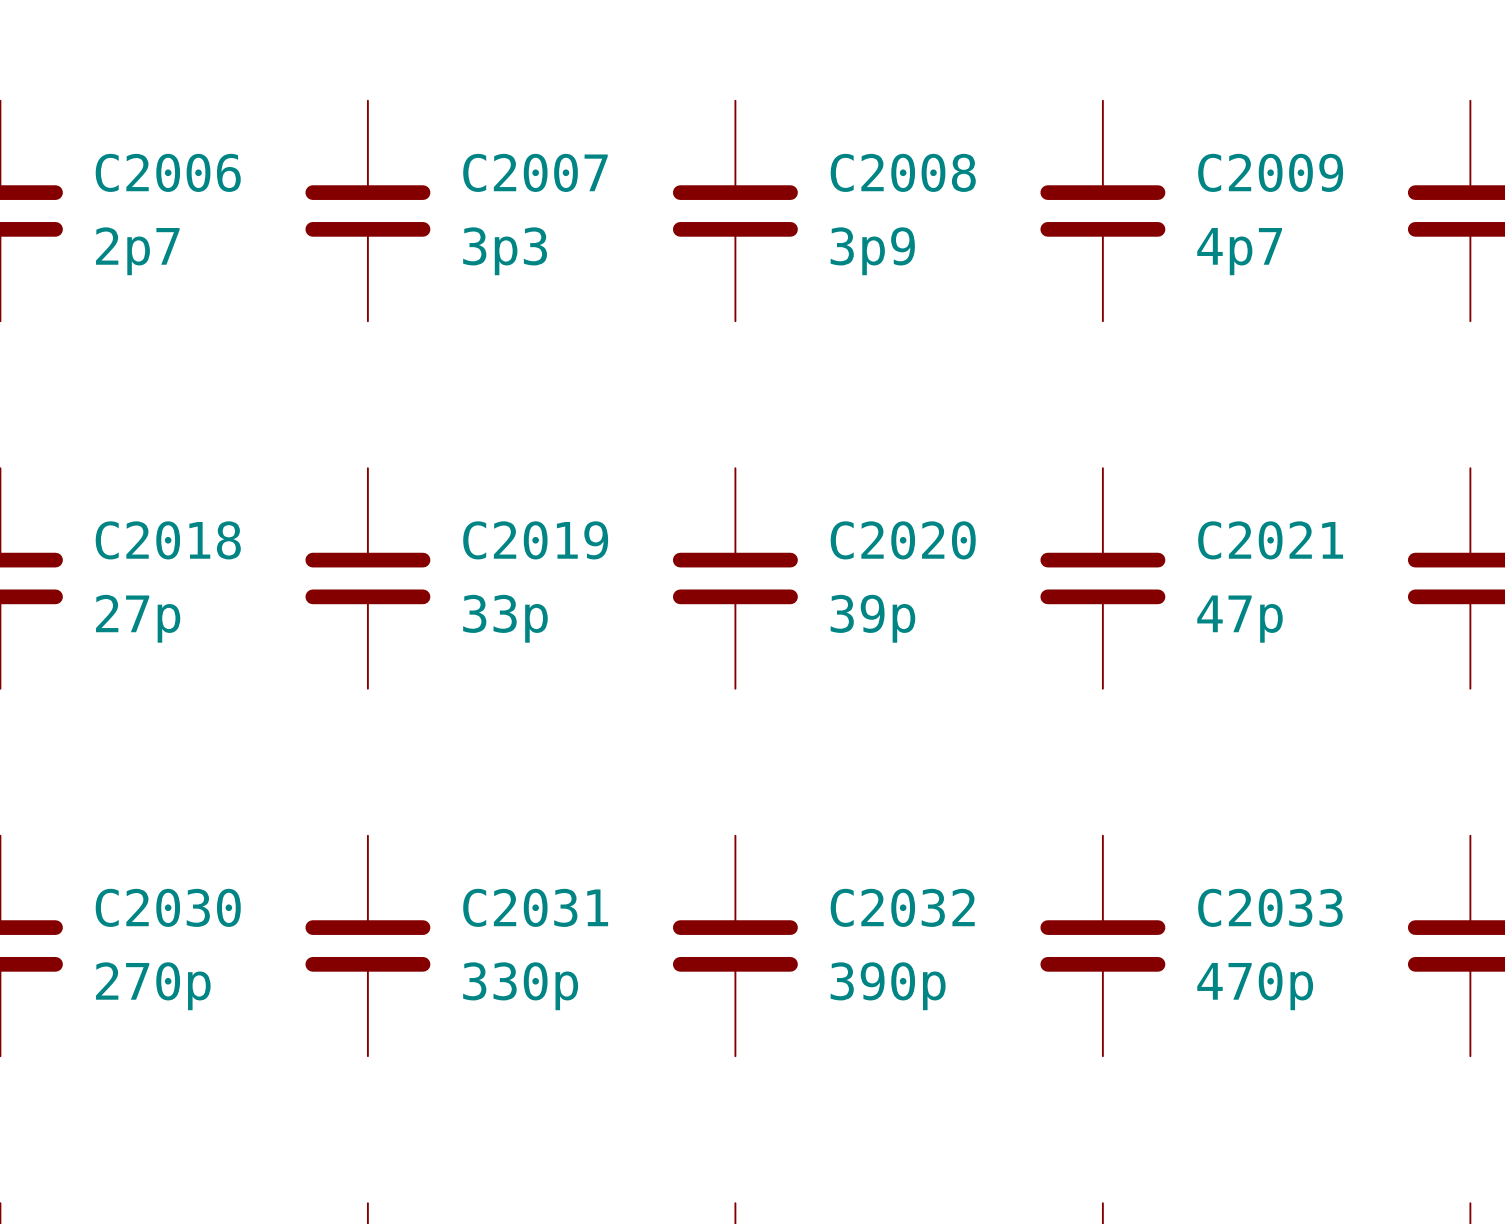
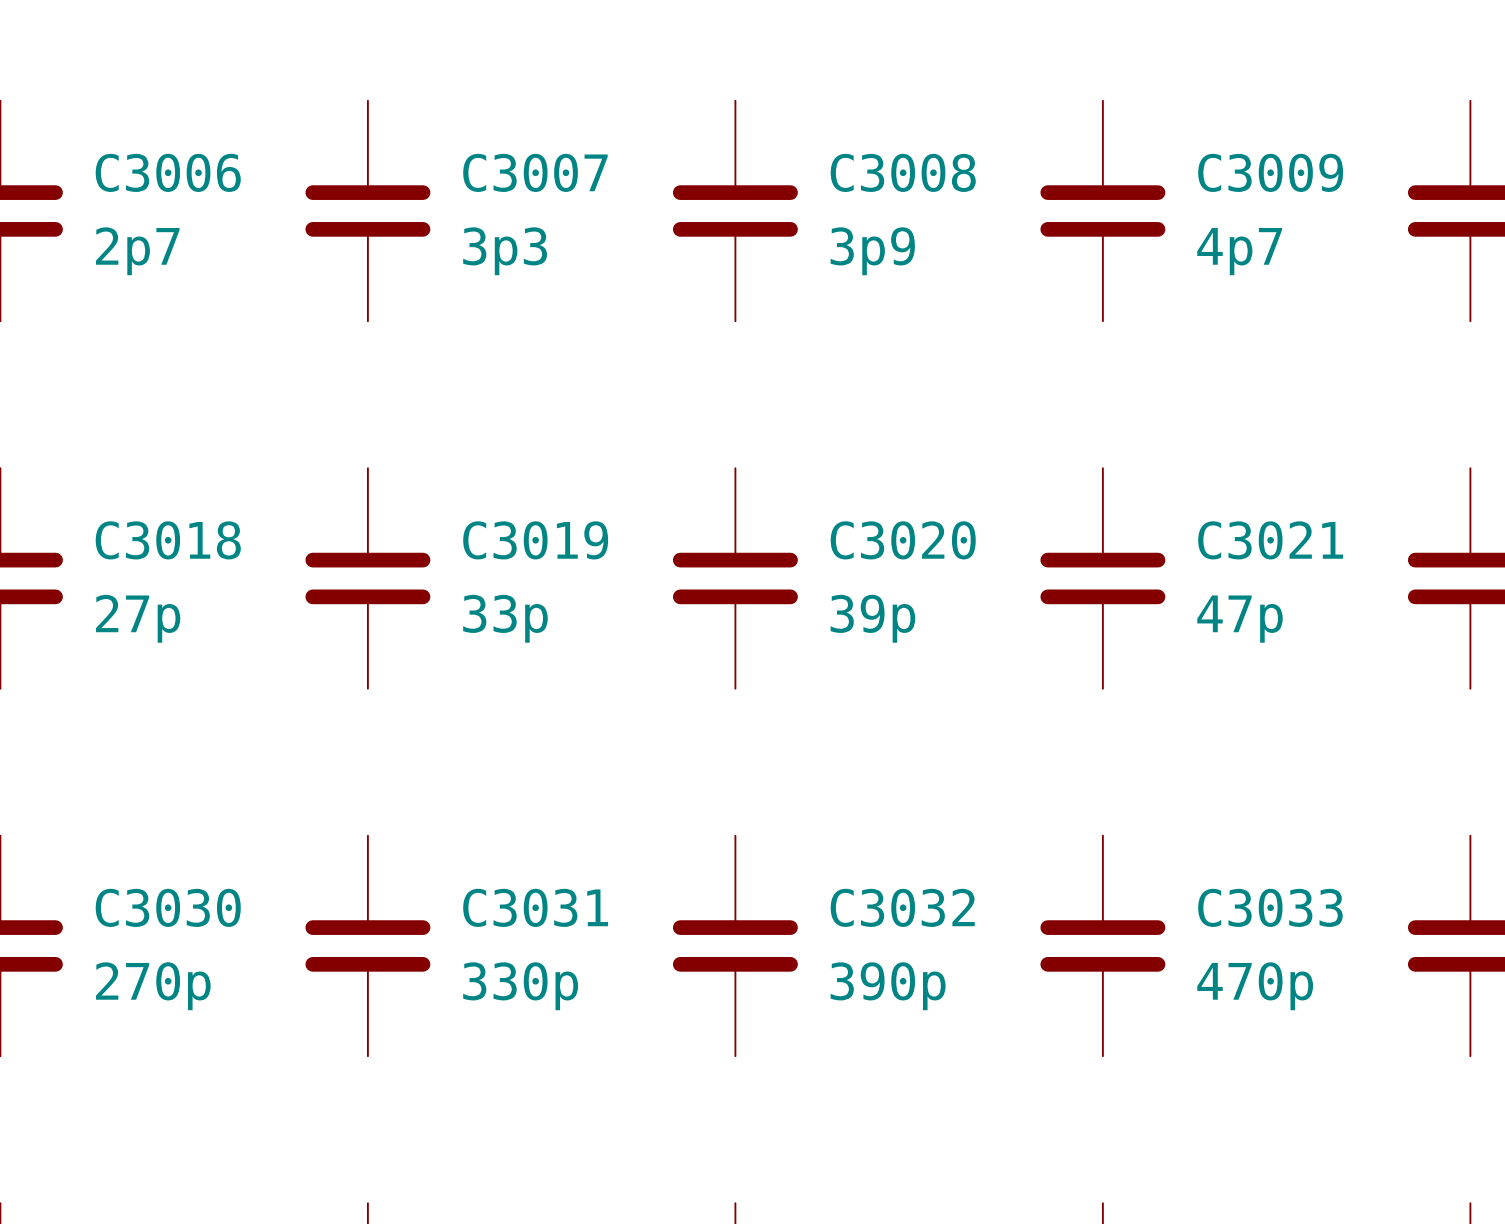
C2006 name: C2006 (168, 172) -> C3006 (168, 172)
C2007 name: C2007 (535, 172) -> C3007 (535, 172)
C2008 name: C2008 (903, 172) -> C3008 (903, 172)
C2009 name: C2009 (1270, 172) -> C3009 (1270, 172)
C2018 name: C2018 (168, 540) -> C3018 (168, 540)
C2019 name: C2019 (535, 540) -> C3019 (535, 540)
C2020 name: C2020 (903, 540) -> C3020 (903, 540)
C2021 name: C2021 (1270, 540) -> C3021 (1270, 540)
C2030 name: C2030 (168, 907) -> C3030 (168, 907)
C2031 name: C2031 (535, 907) -> C3031 (535, 907)
C2032 name: C2032 (902, 907) -> C3032 (902, 907)
C2033 name: C2033 (1270, 907) -> C3033 (1270, 907)

